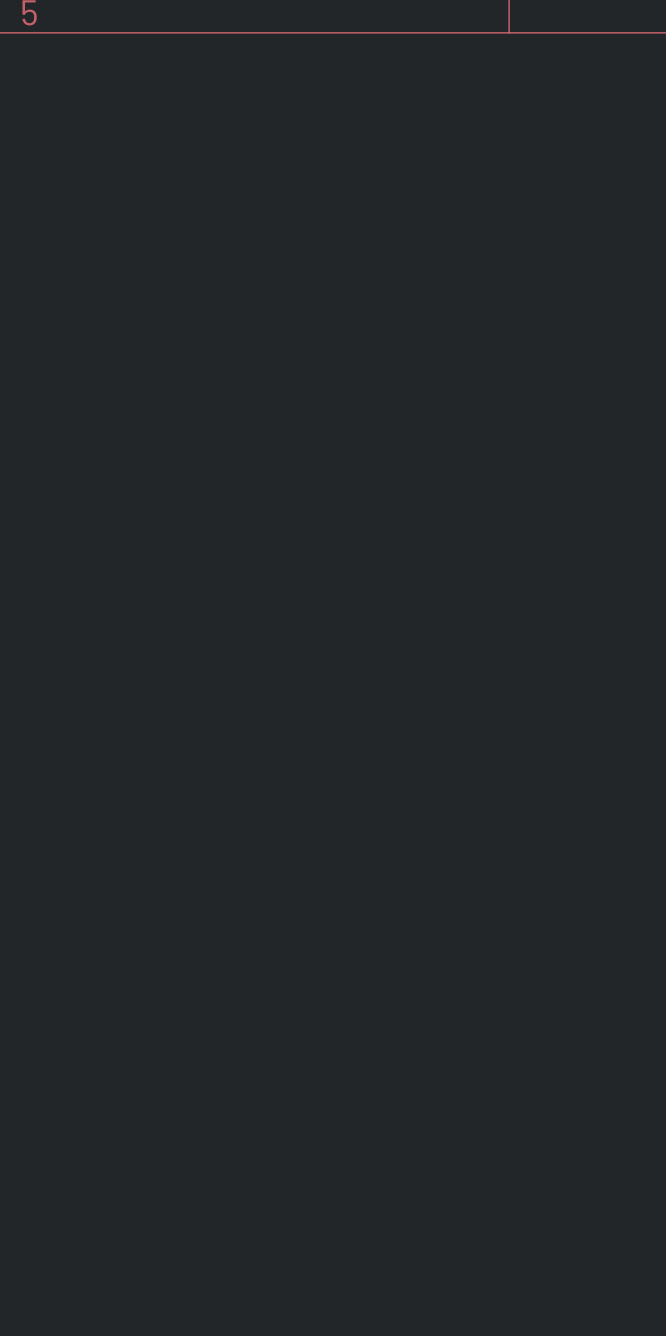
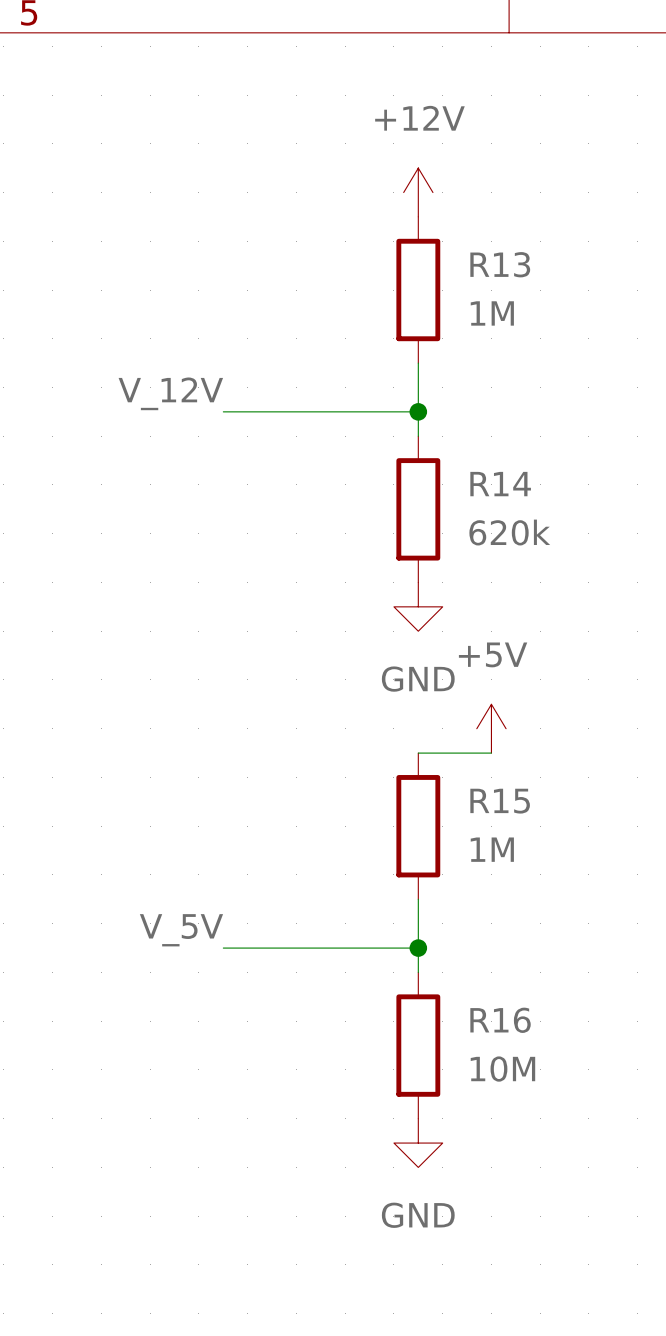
power symbol: none -> +12V (418, 192)
R13: none -> 1M (418, 290)
wire: none -> (418, 363) (418, 436)
label: none -> V_12V (170, 393)
wire: none -> (223, 411) (418, 411)
junction: none -> (418, 411)
R14: none -> 620k (418, 509)
power symbol: none -> GND (418, 606)
power symbol: none -> +5V (491, 728)
wire: none -> (418, 753) (491, 753)
R15: none -> 1M (418, 826)
wire: none -> (418, 899) (418, 972)
label: none -> V_5V (181, 930)
wire: none -> (223, 948) (418, 948)
junction: none -> (418, 948)
R16: none -> 10M (418, 1045)
power symbol: none -> GND (418, 1143)

